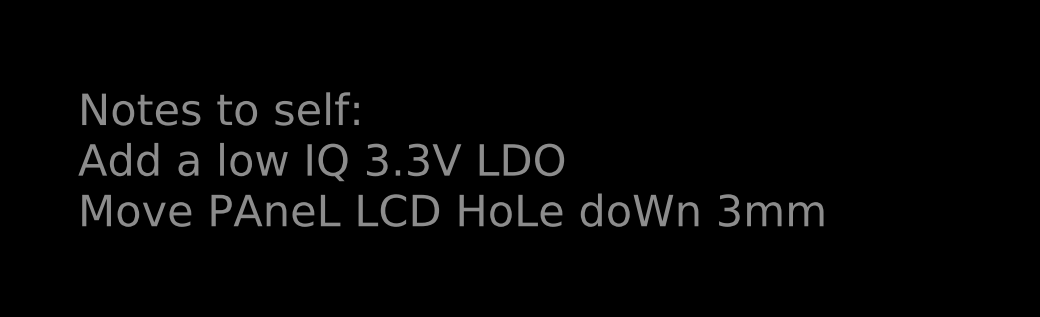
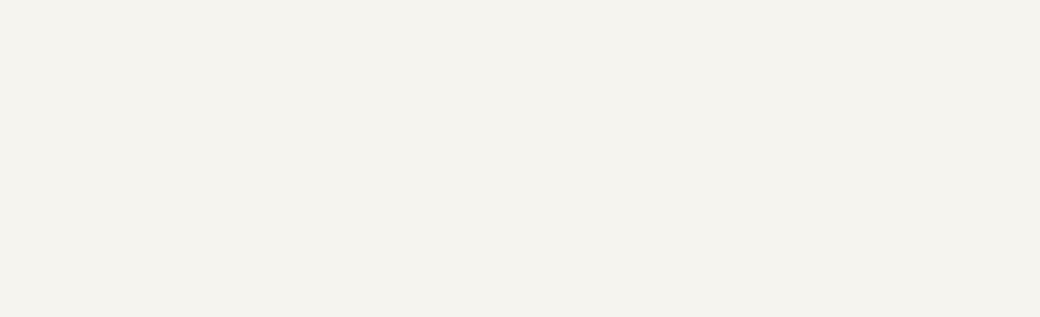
text: Notes to self: (220, 108) -> none
text: Add a low IQ 3.3V LDO (321, 162) -> none
text: Move PAneL LCD HoLe doWn 3mm (452, 210) -> none

